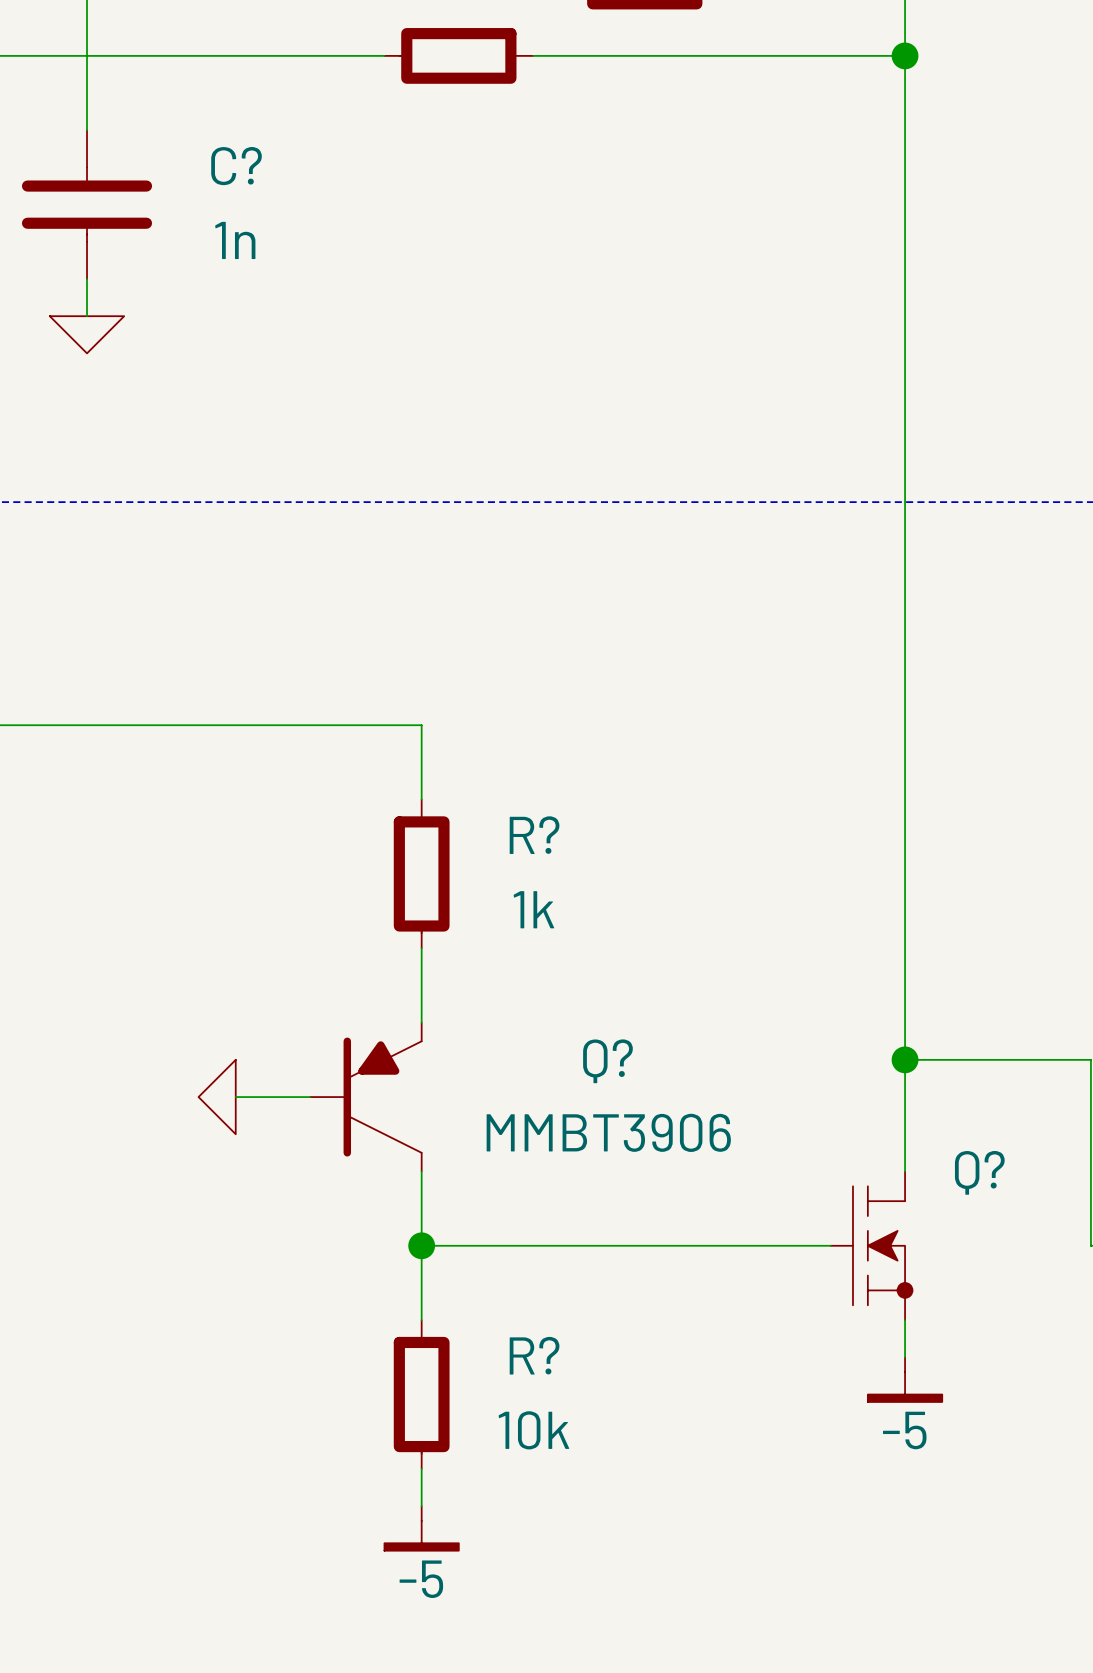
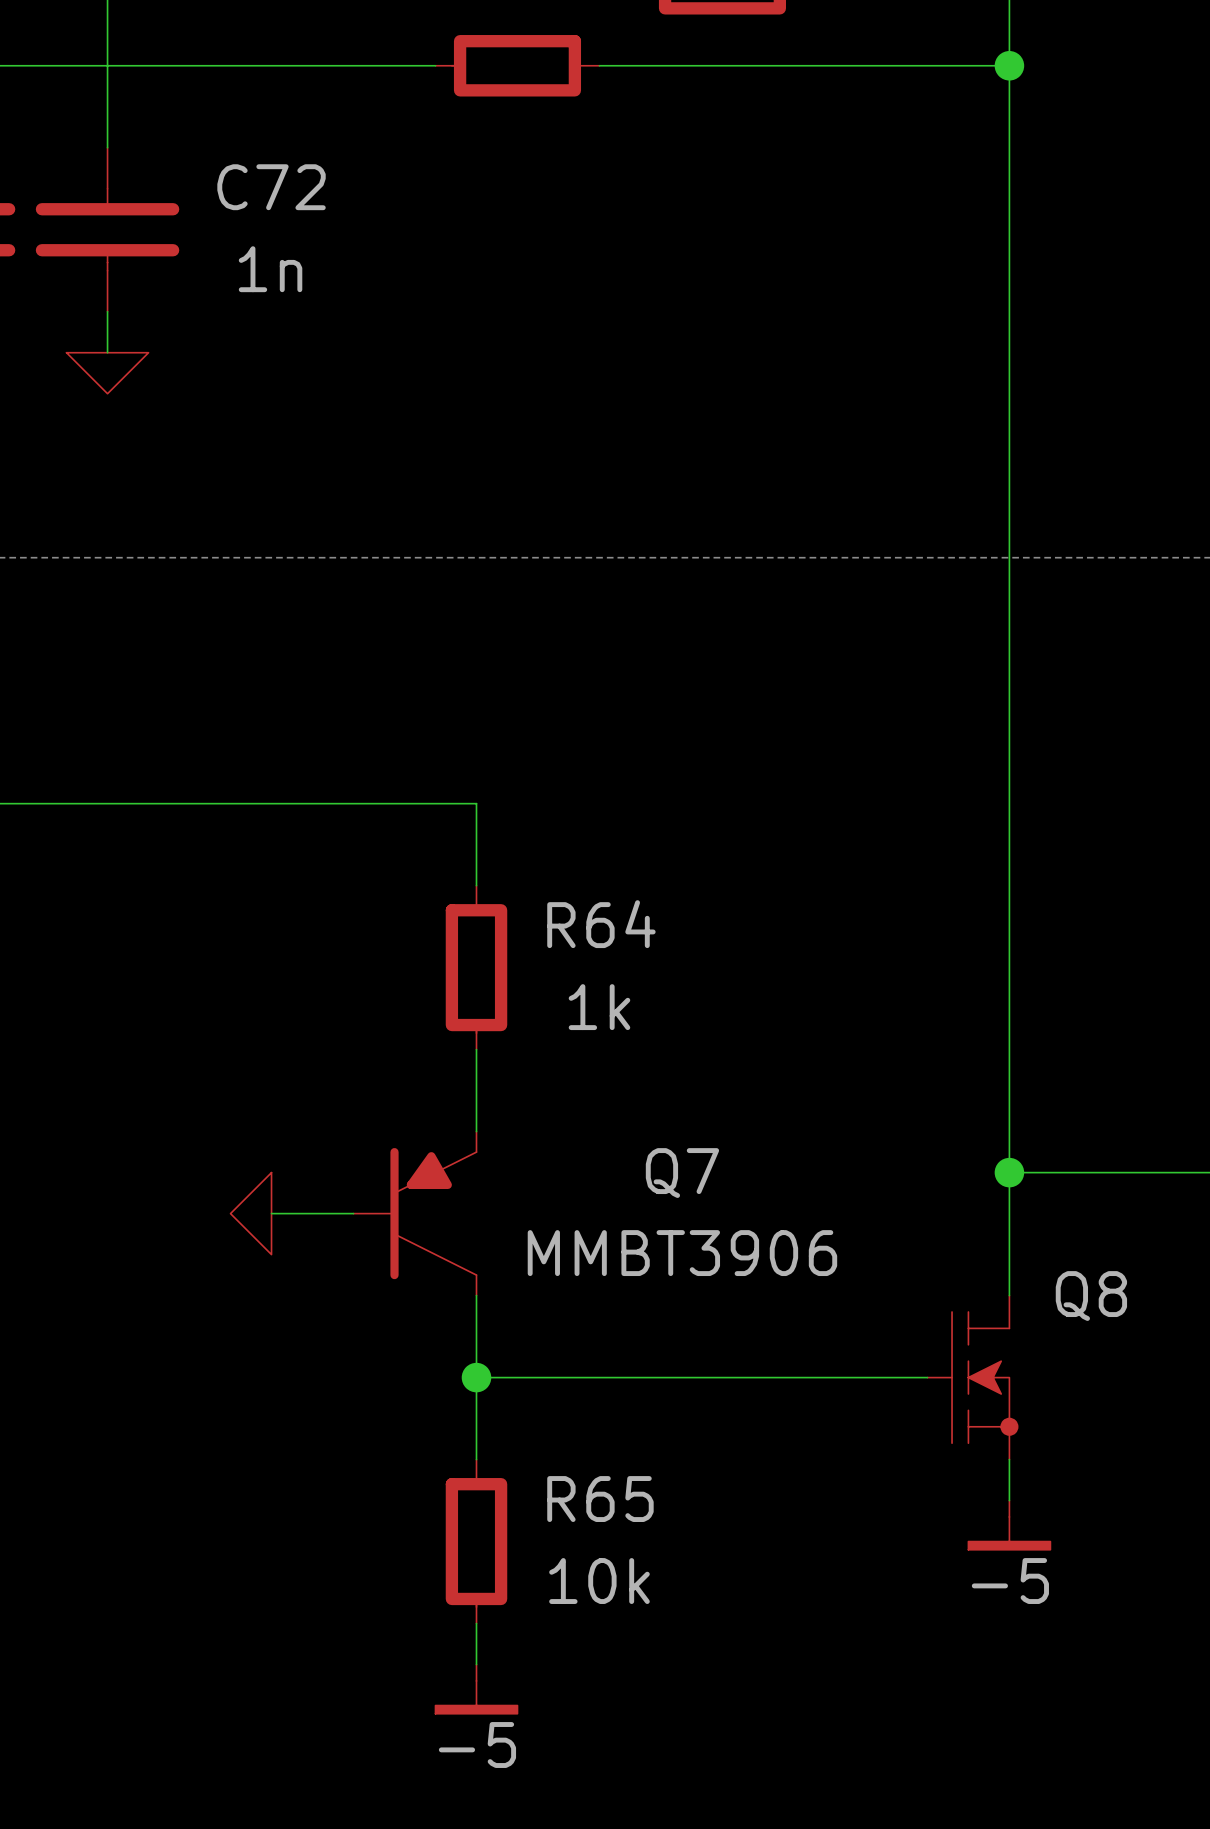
C? name: C? (236, 166) -> C72 (271, 187)
R? name: R? (534, 835) -> R64 (601, 924)
Q? name: Q? (607, 1061) -> Q7 (682, 1173)
Q? name: Q? (979, 1172) -> Q8 (1091, 1296)
R? name: R? (534, 1355) -> R65 (600, 1499)

